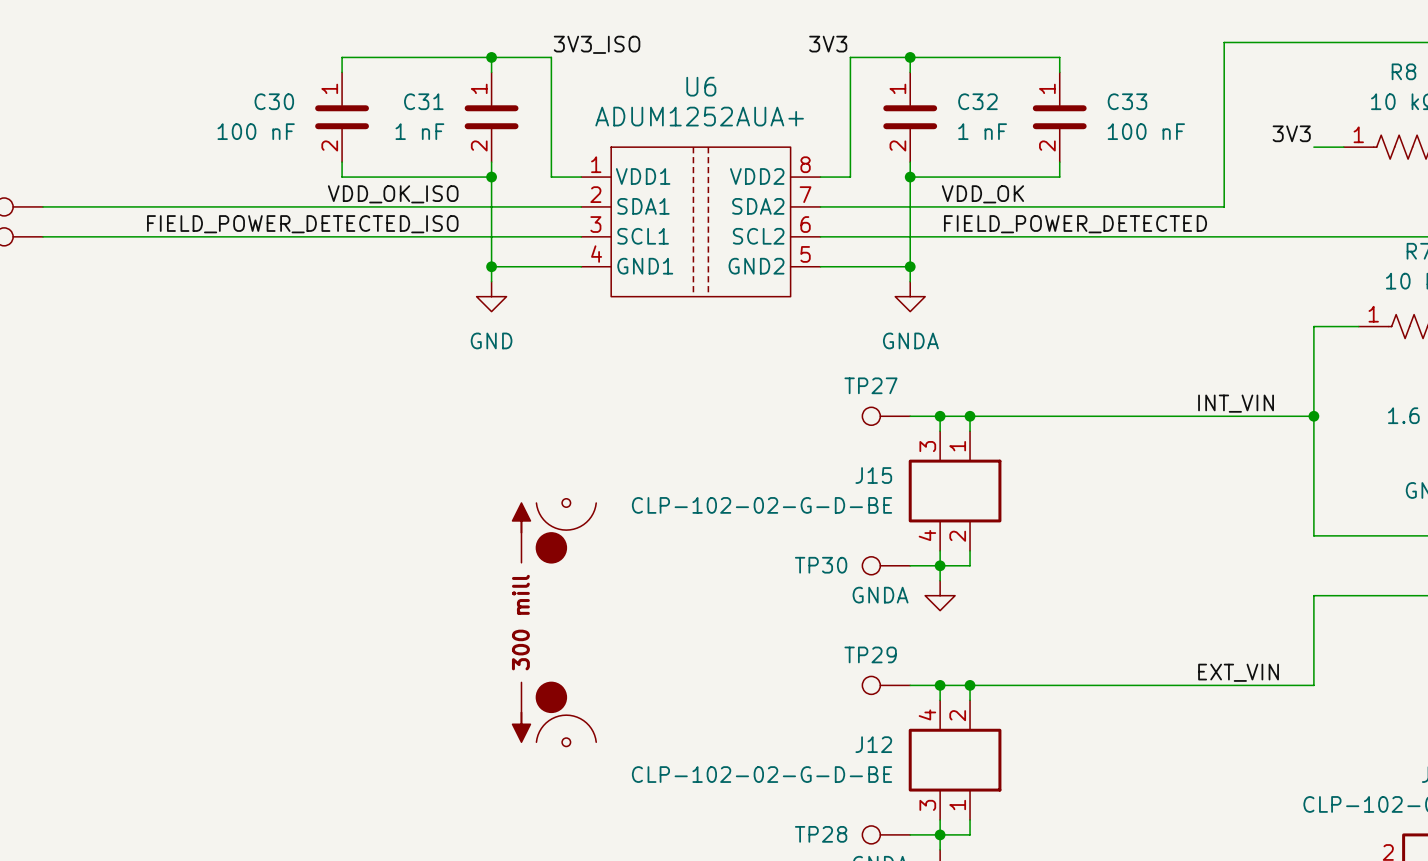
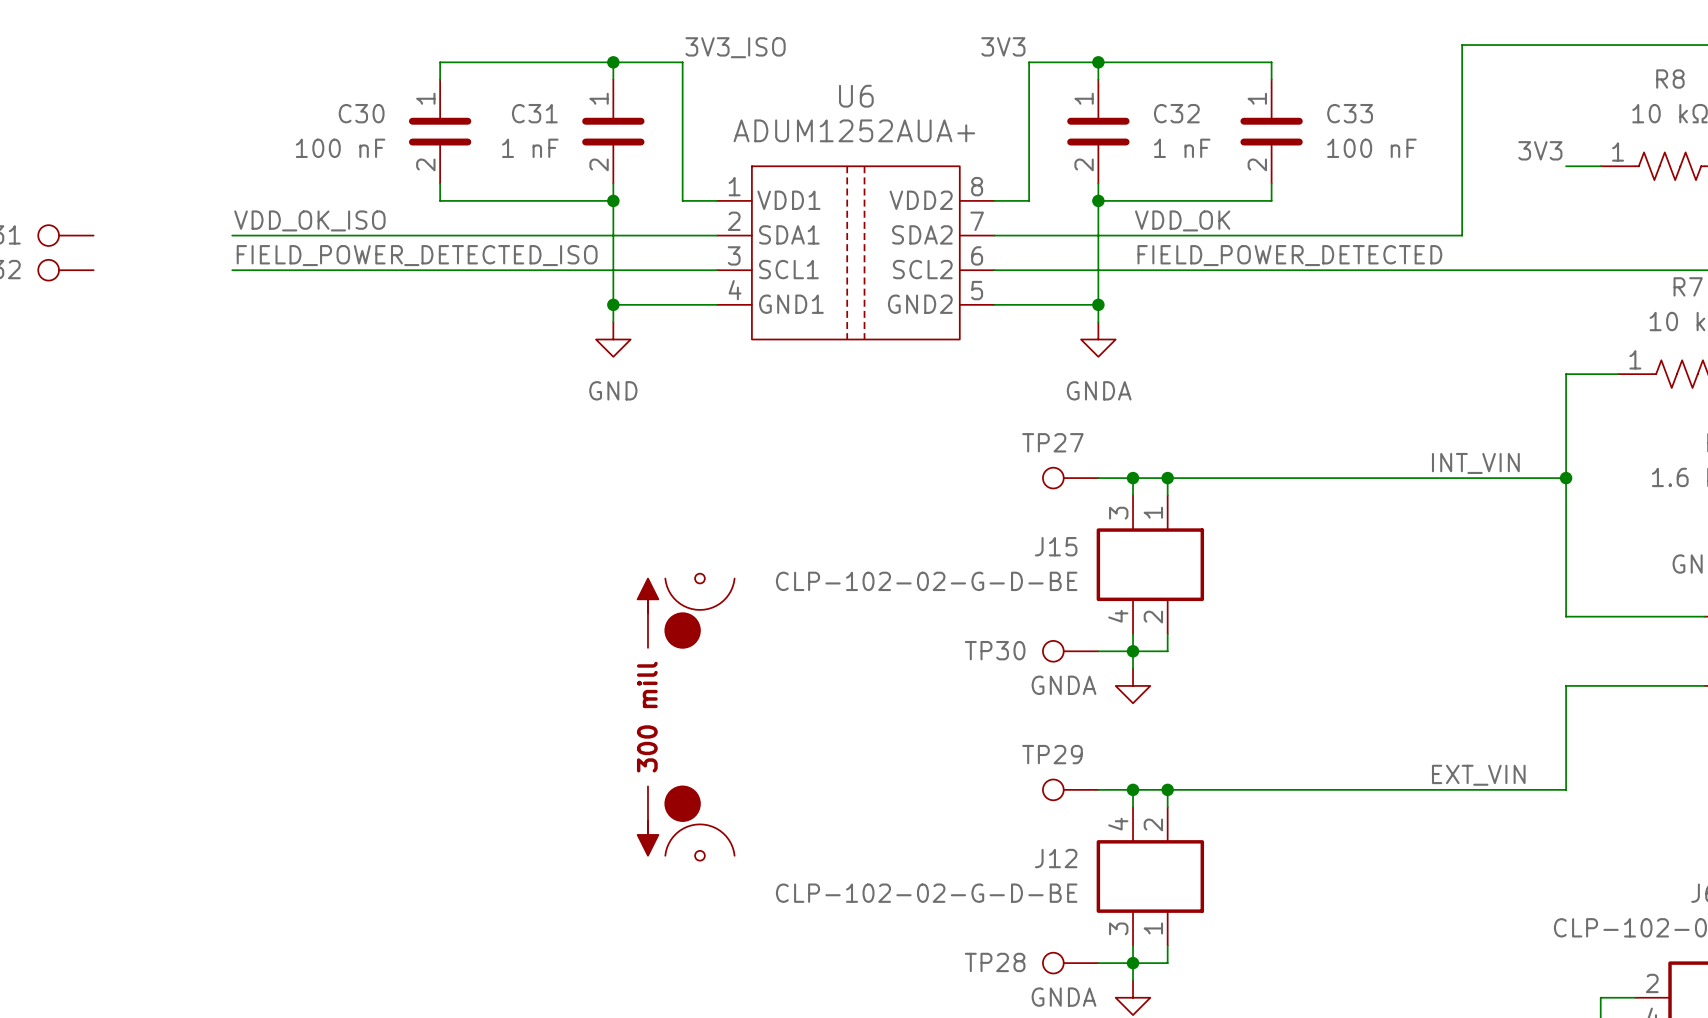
label: none -> VDD_OK_ISO (309, 220)
label: VDD_OK_ISO (393, 194) -> none
wire: (43, 206) (162, 206) -> none
label: FIELD_POWER_DETECTED_ISO (302, 224) -> none
label: none -> FIELD_POWER_DETECTED_ISO (417, 255)
wire: (43, 236) (162, 236) -> none

